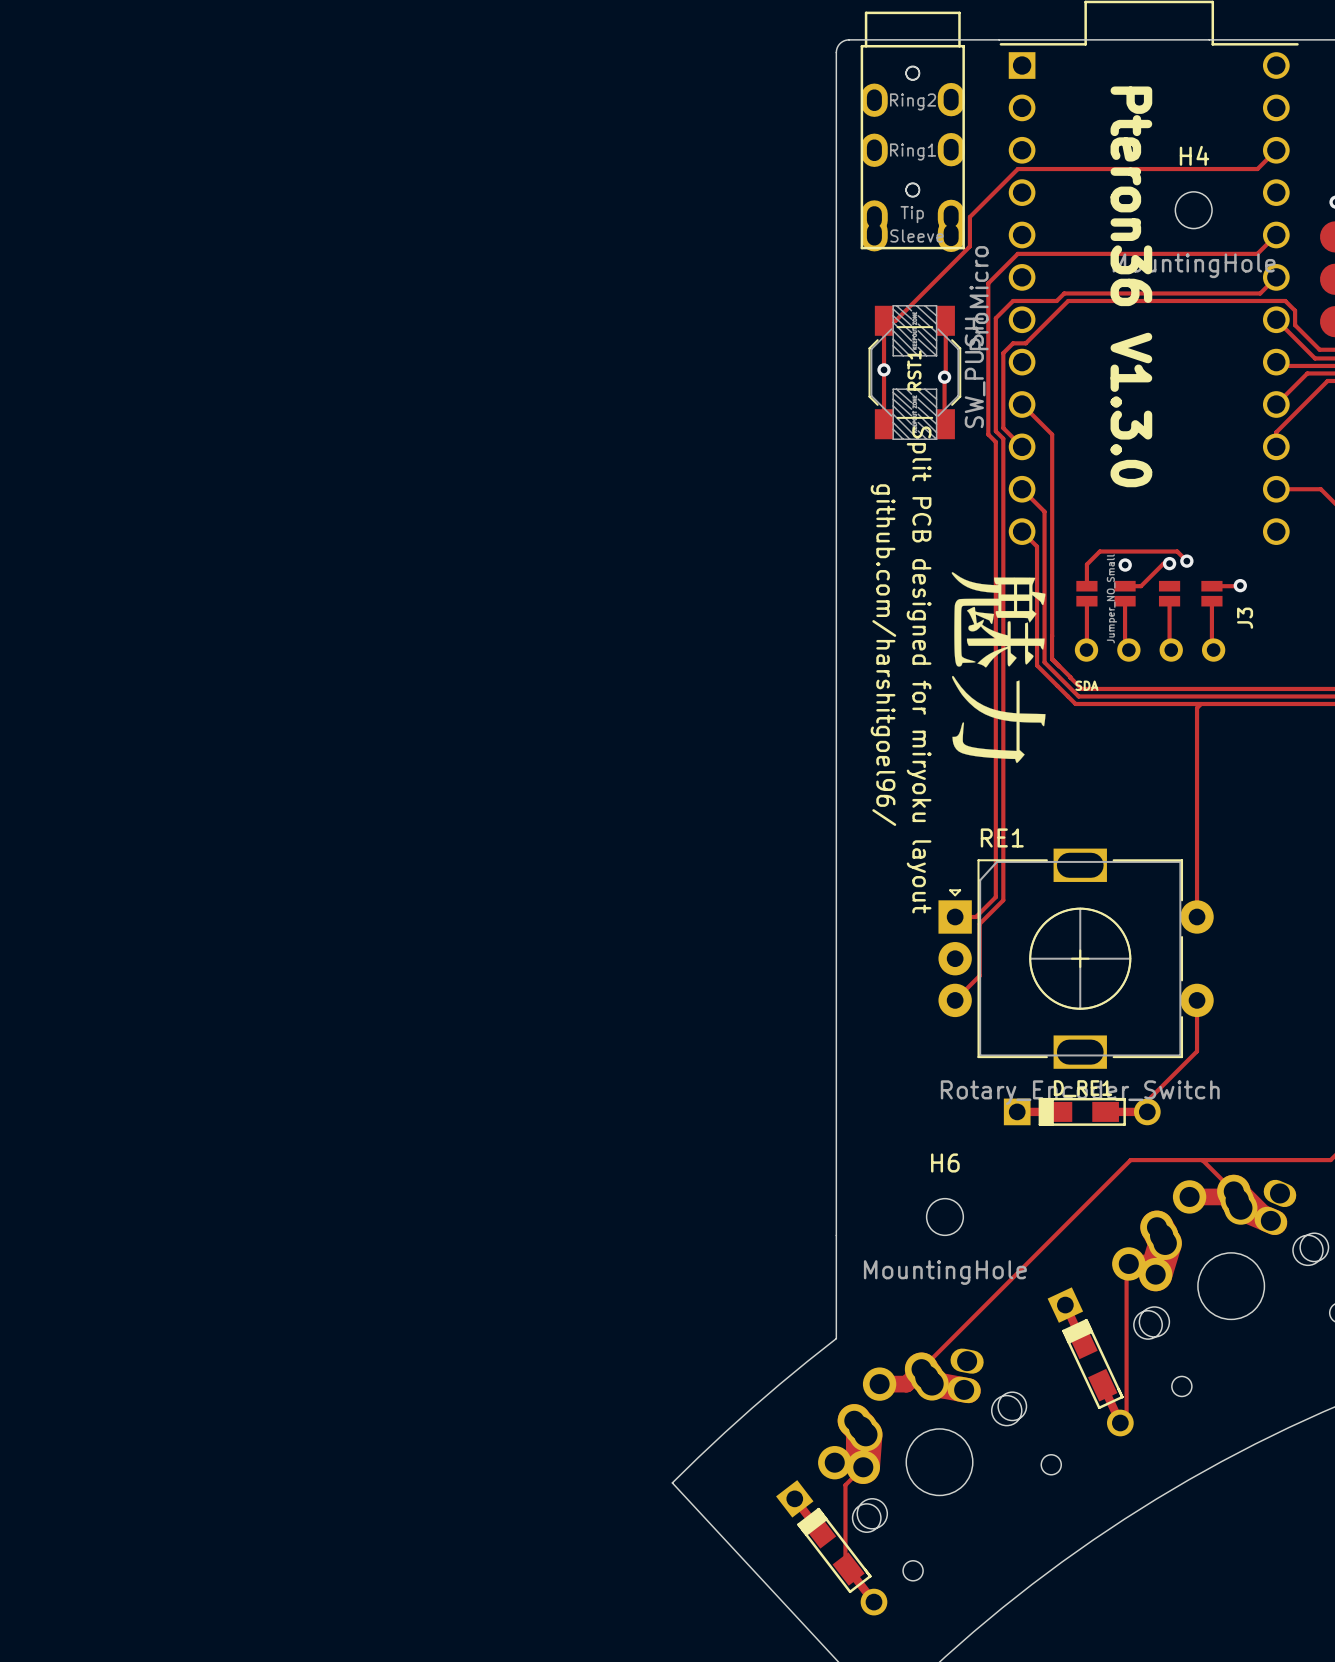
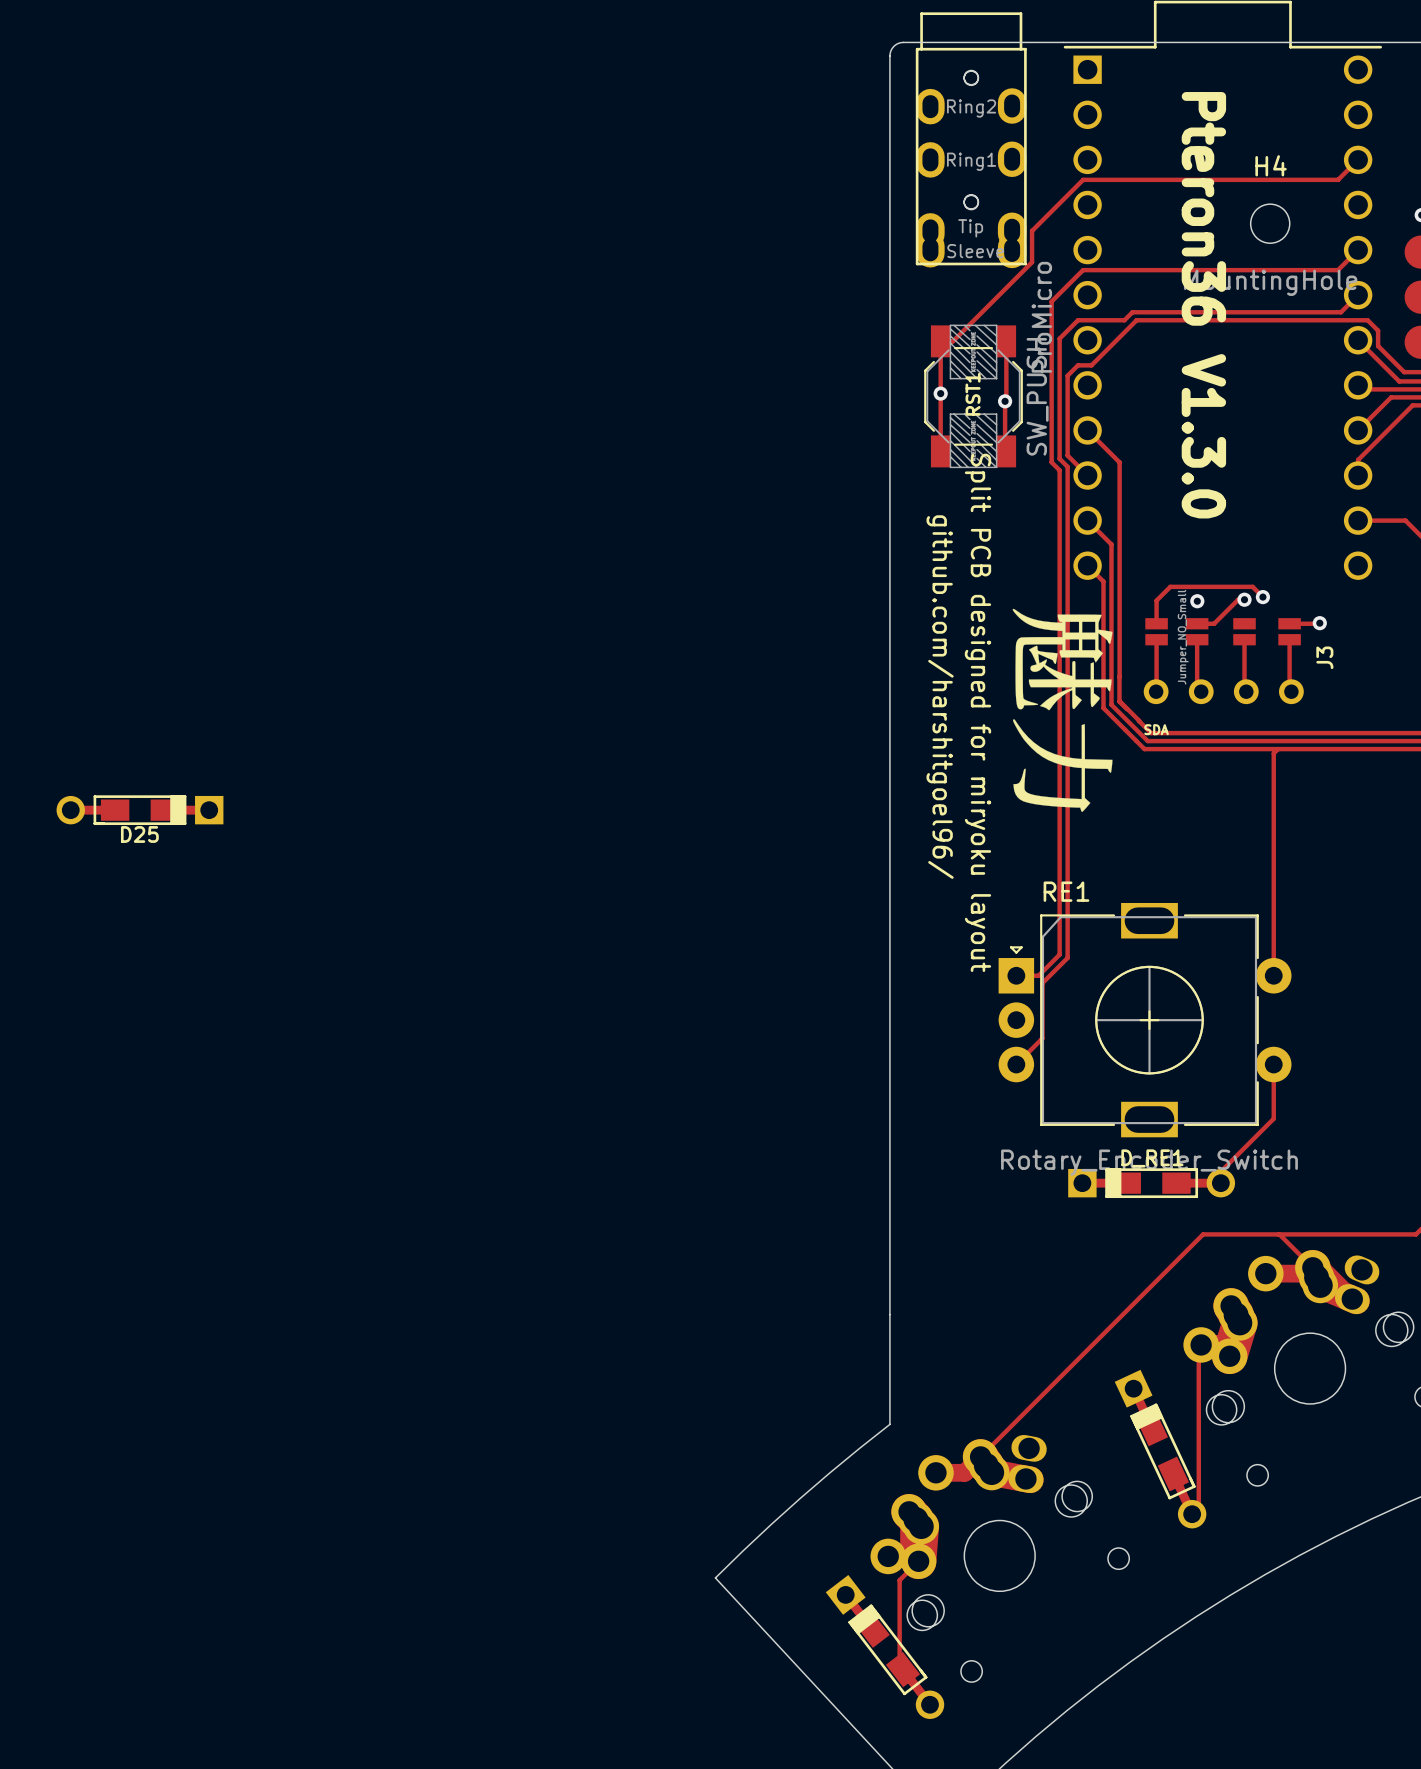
D25: none -> (139, 810)
H6: MountingHole (944, 1216) -> none

